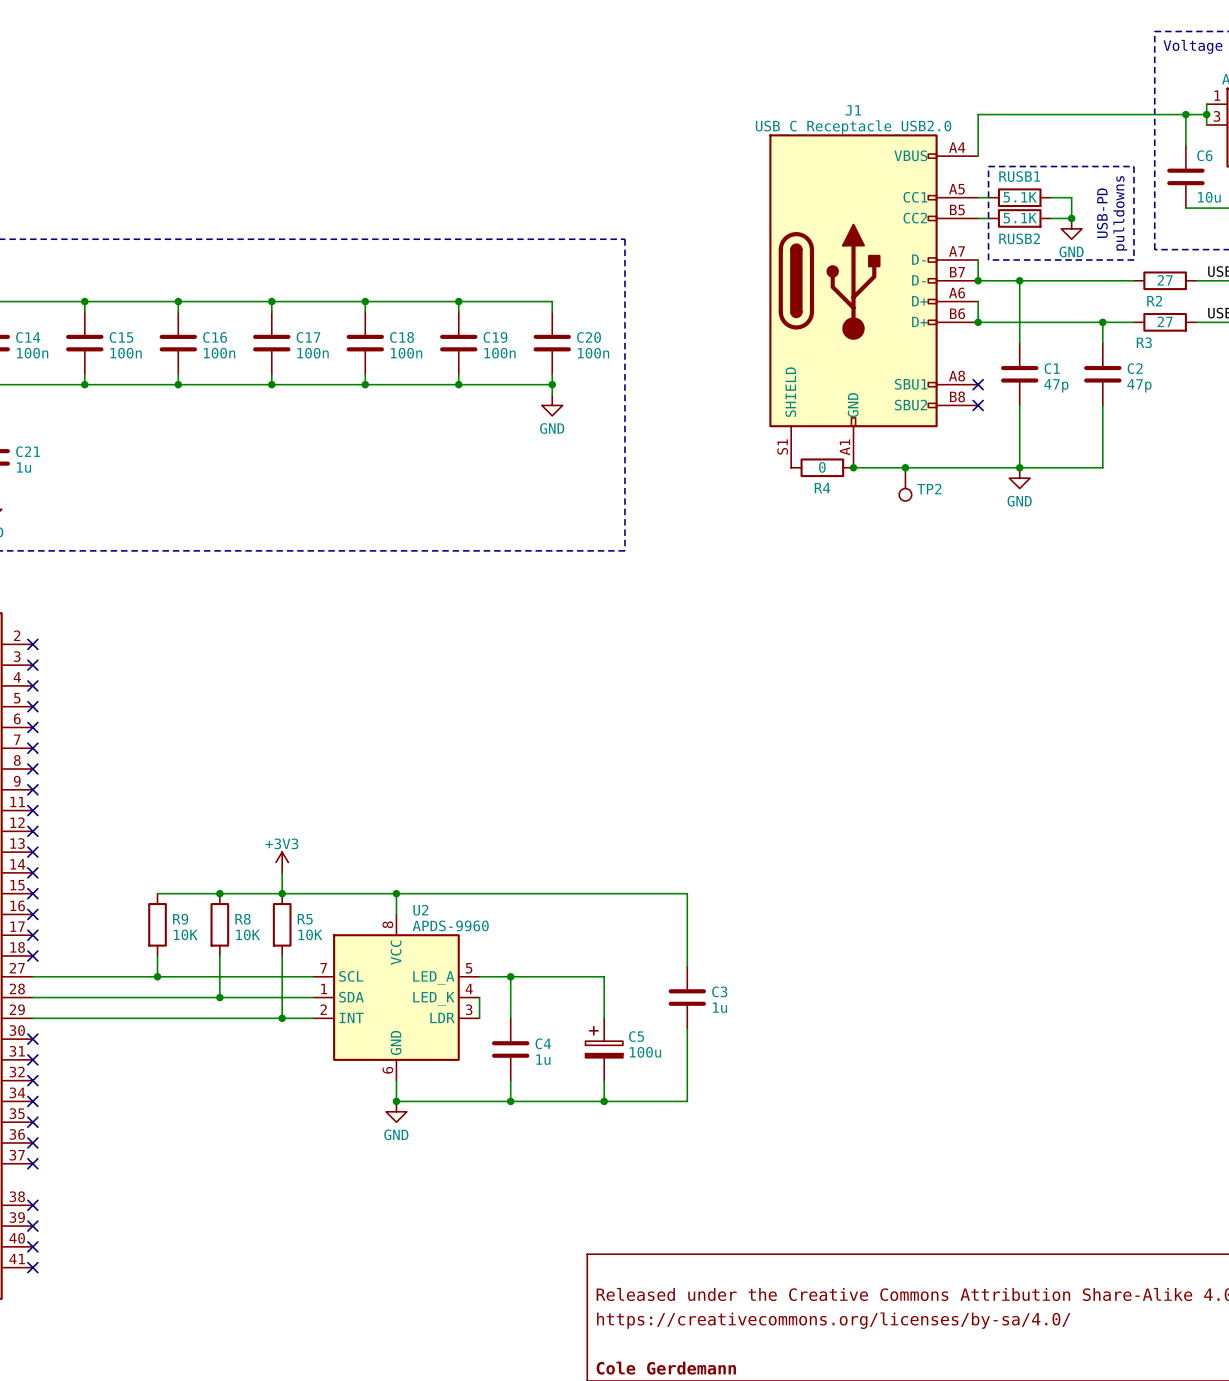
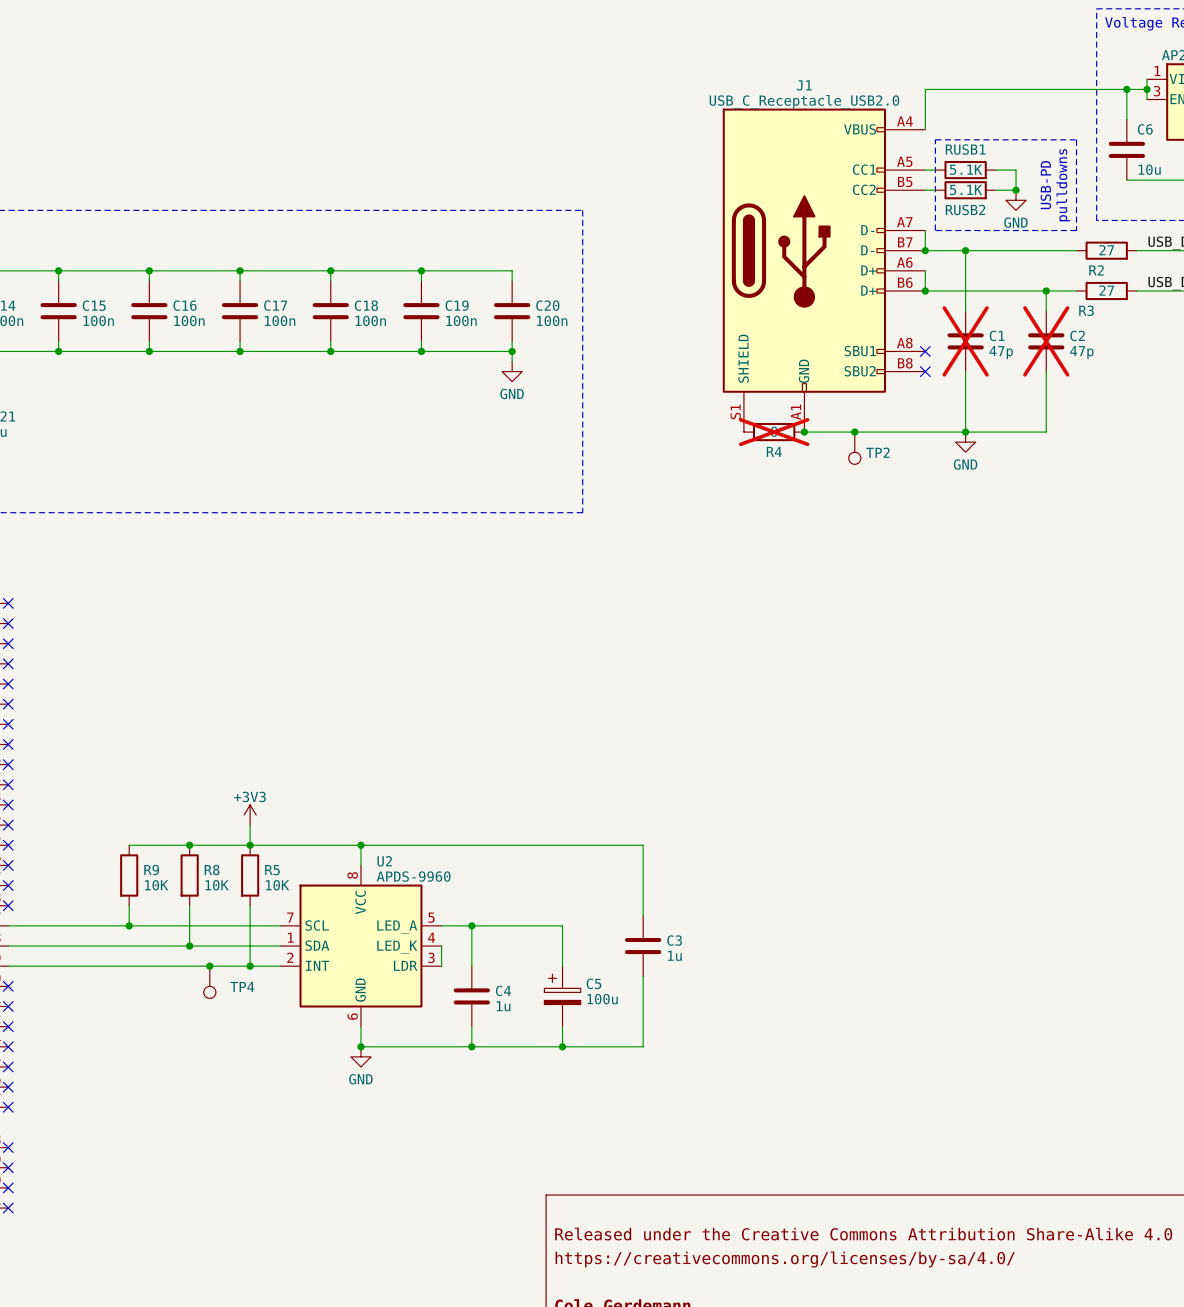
C1 do-not-place cross: none -> (965, 341)
C2 do-not-place cross: none -> (1046, 341)
R4 do-not-place cross: none -> (774, 432)
junction: none -> (209, 966)
TP4: none -> (209, 982)

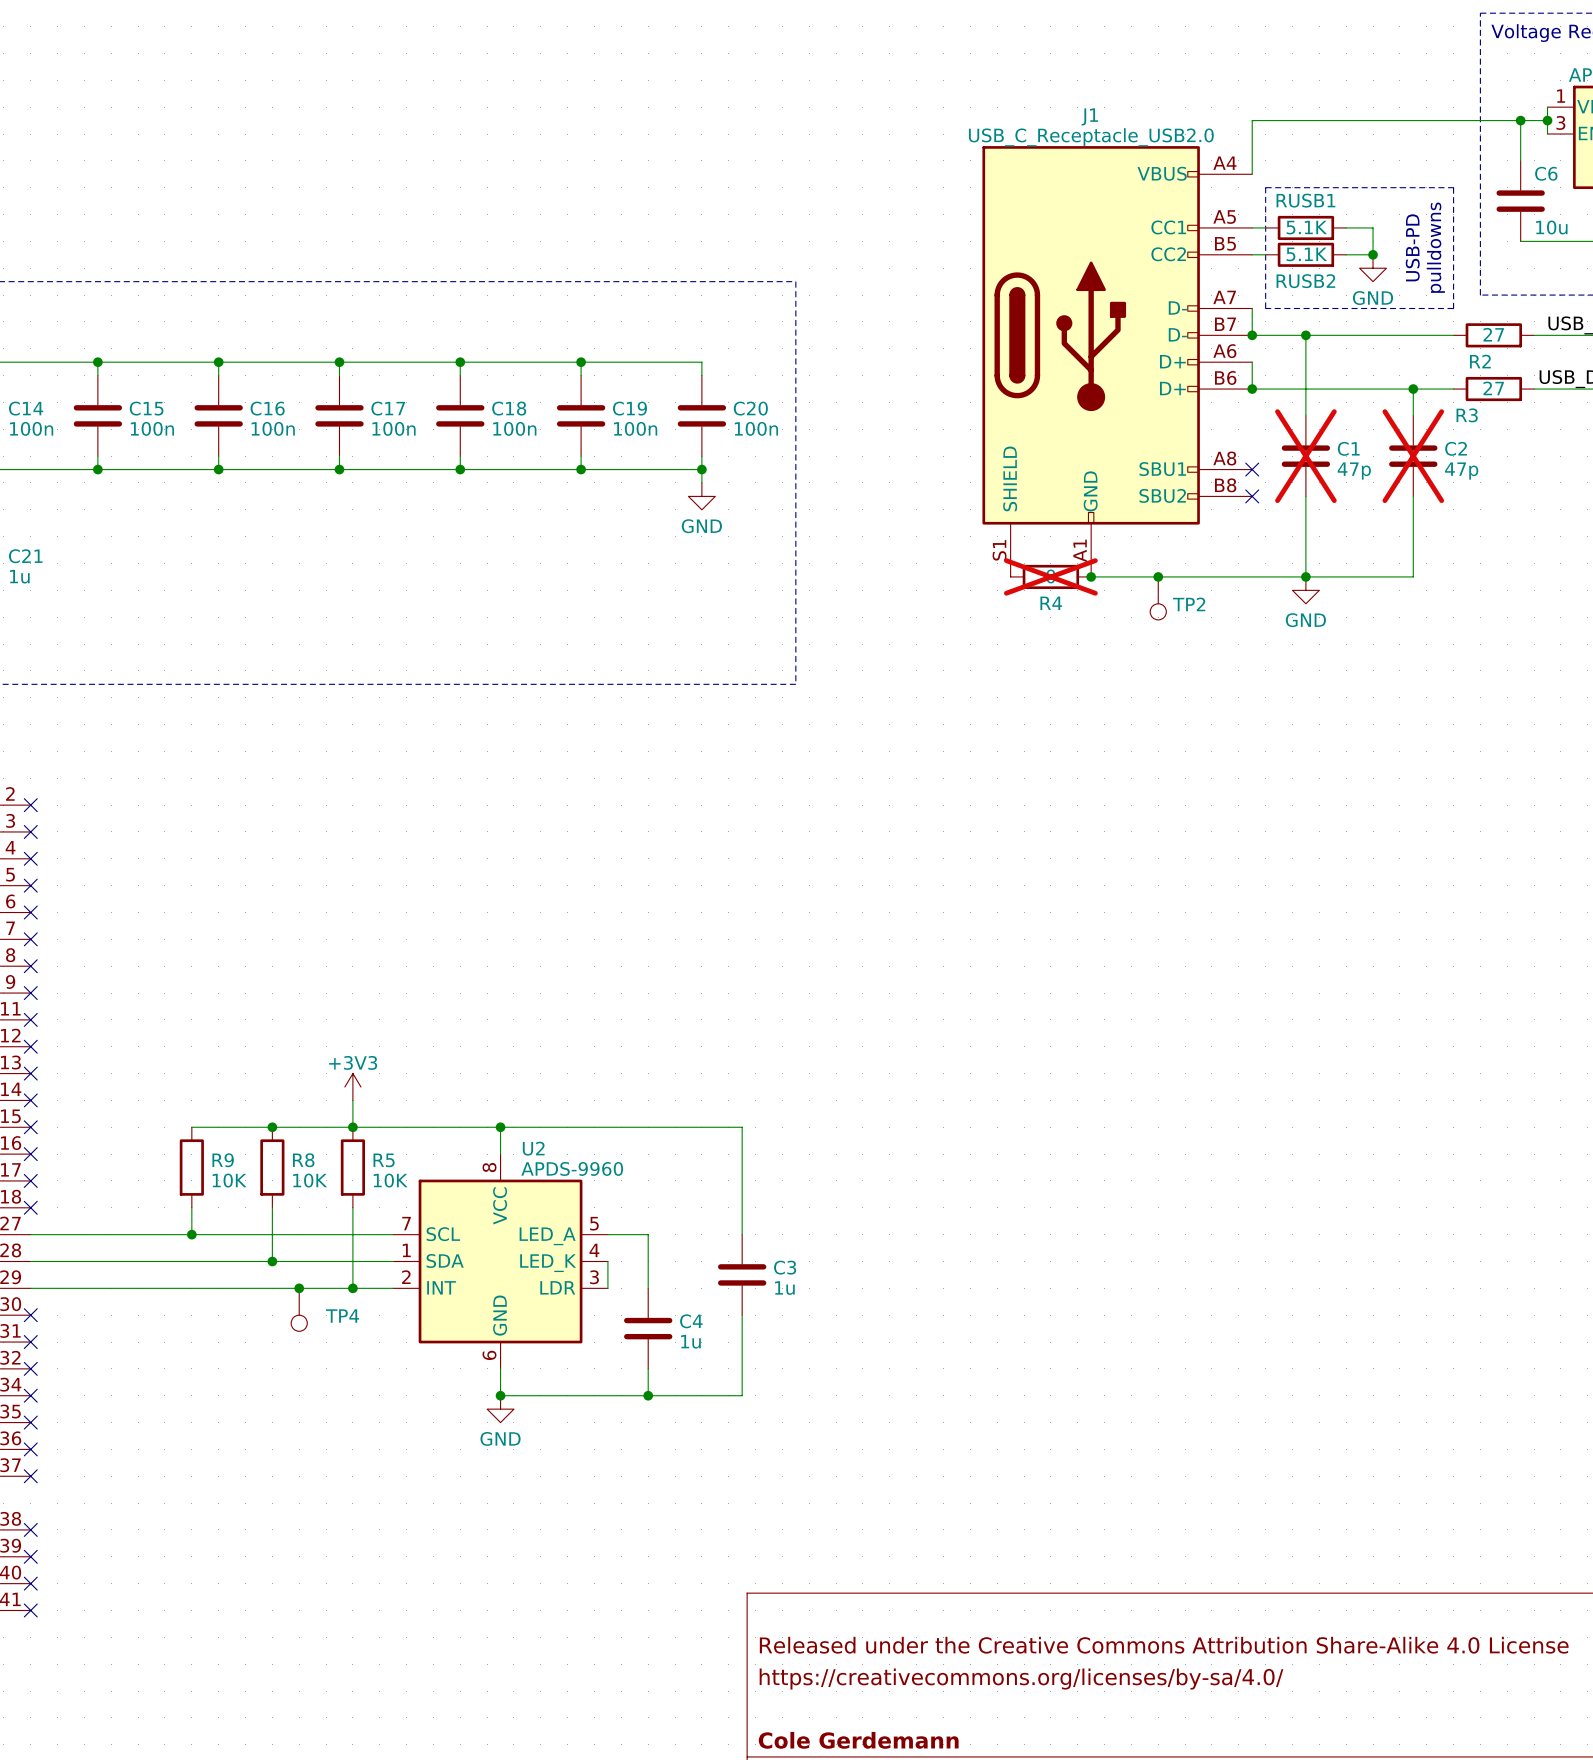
wire: (542, 845) (643, 845) (643, 915) -> (742, 1127) (742, 1234)
wire: (471, 925) (562, 925) (562, 966) -> none
junction: (471, 925) -> none
C3 position: (643, 946) -> (742, 1274)
wire: (643, 976) (643, 1046) (542, 1046) -> (742, 1315) (742, 1395)
C5: 100u (562, 996) -> none
wire: (562, 1026) (562, 1046) -> none
junction: (562, 1046) -> none

